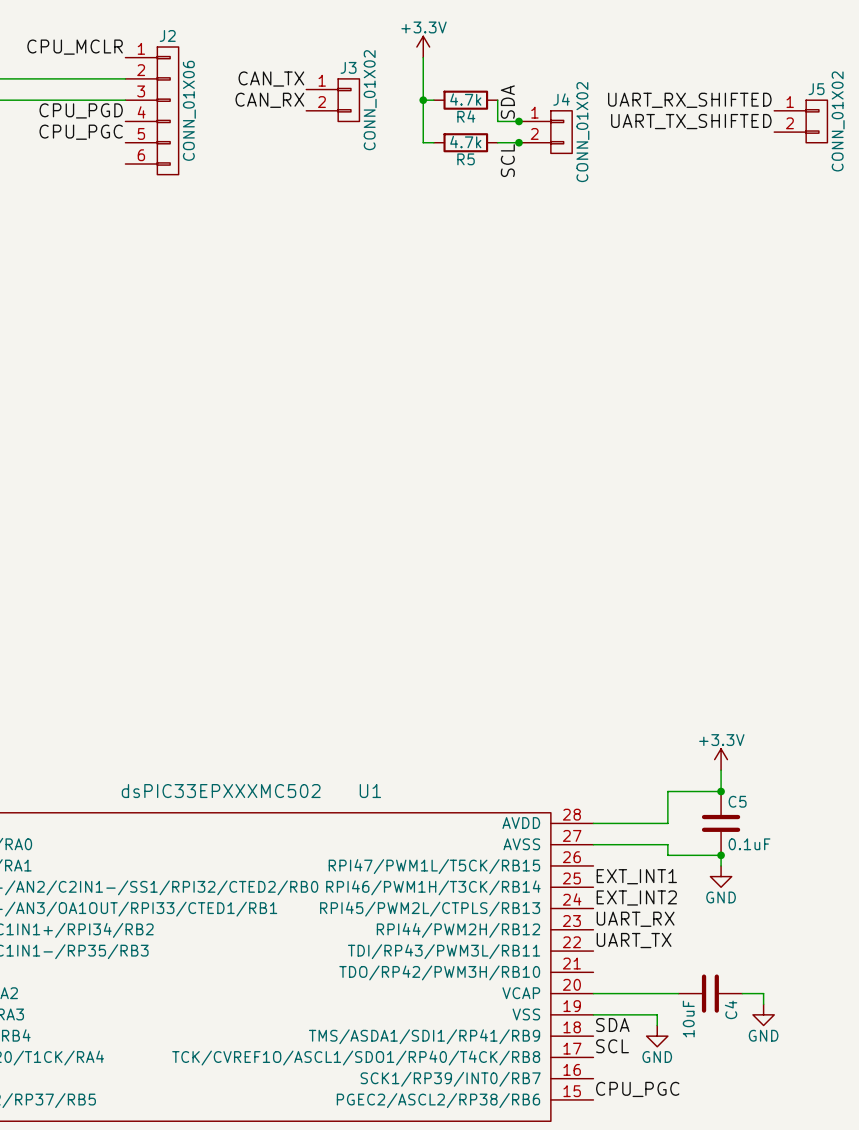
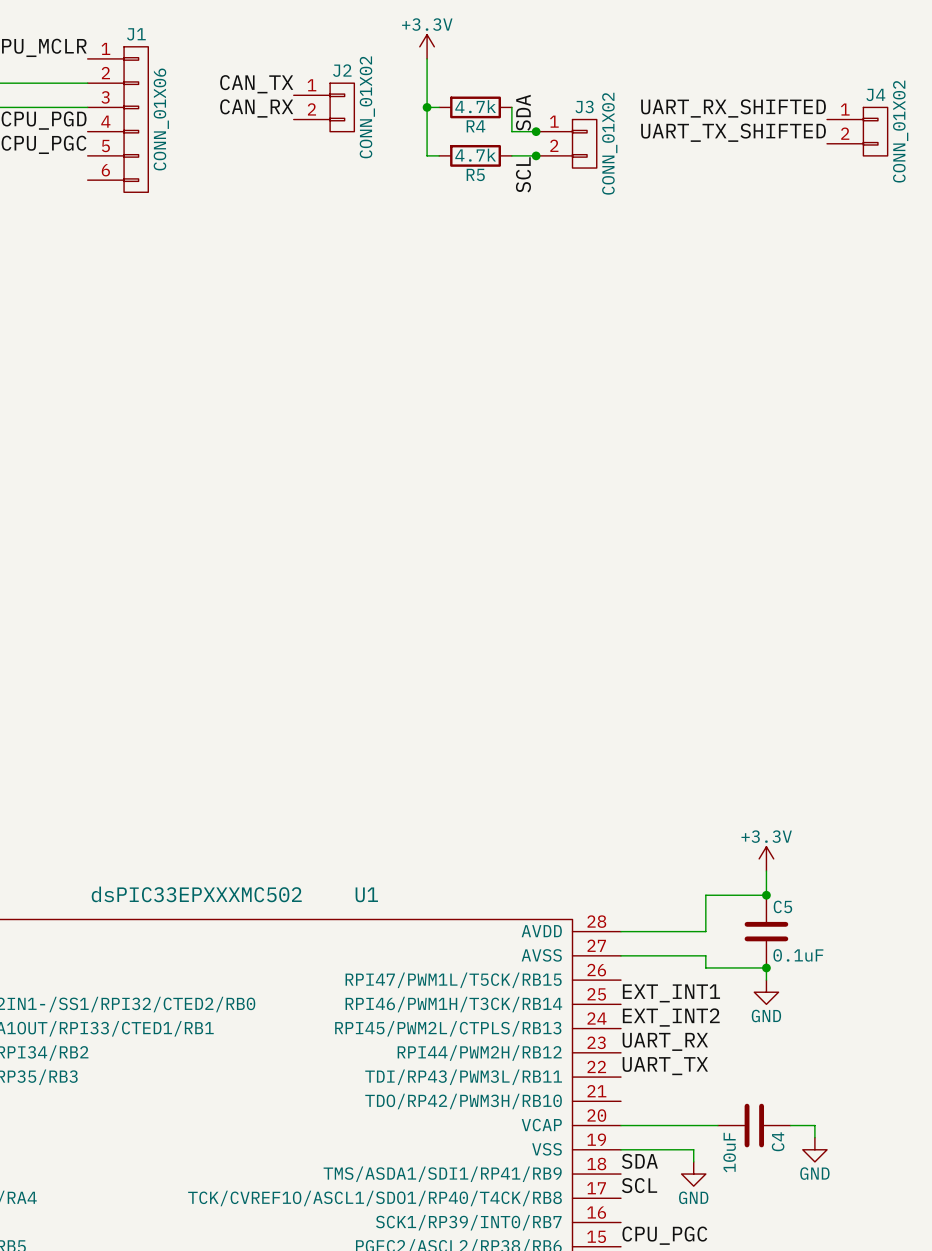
J2 name: J2 (167, 35) -> J1 (136, 34)
J3 name: J3 (348, 67) -> J2 (342, 70)
J5 name: J5 (816, 89) -> J4 (875, 94)
J4 name: J4 (561, 99) -> J3 (584, 106)

